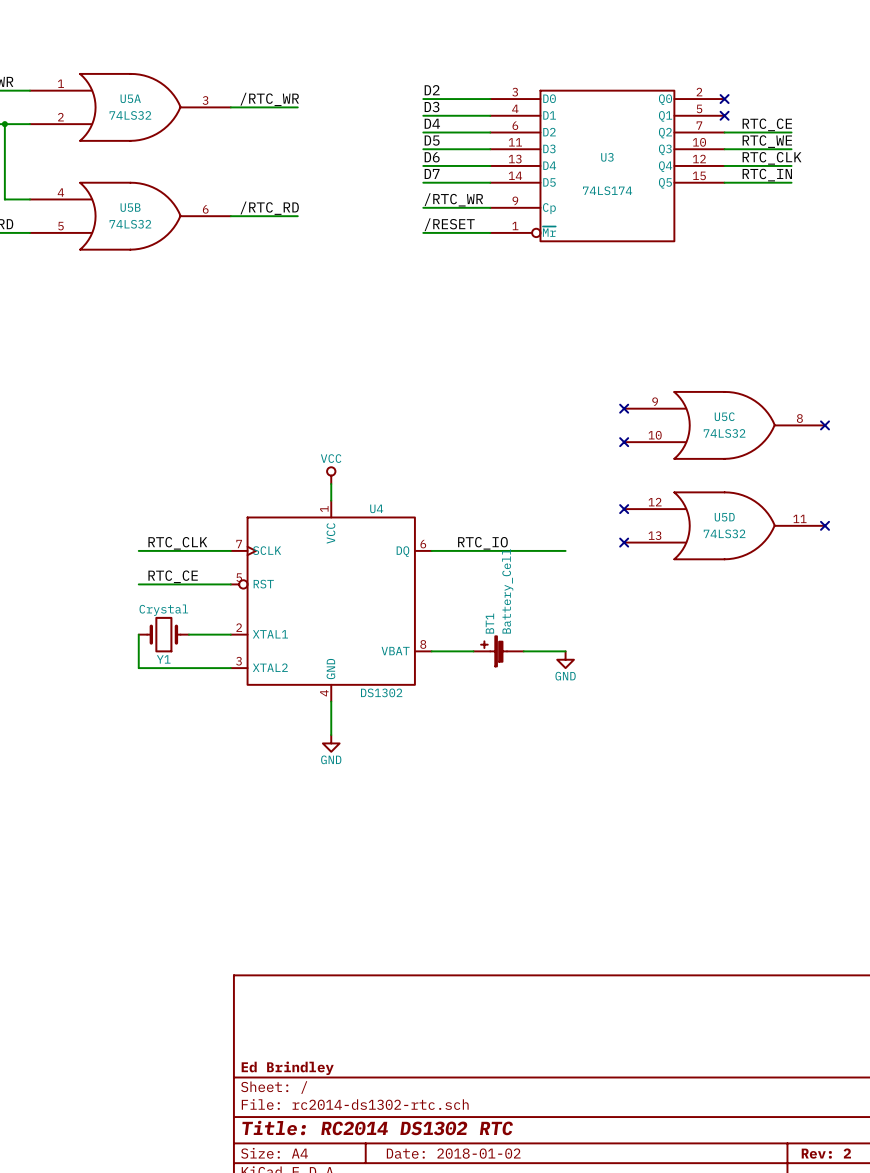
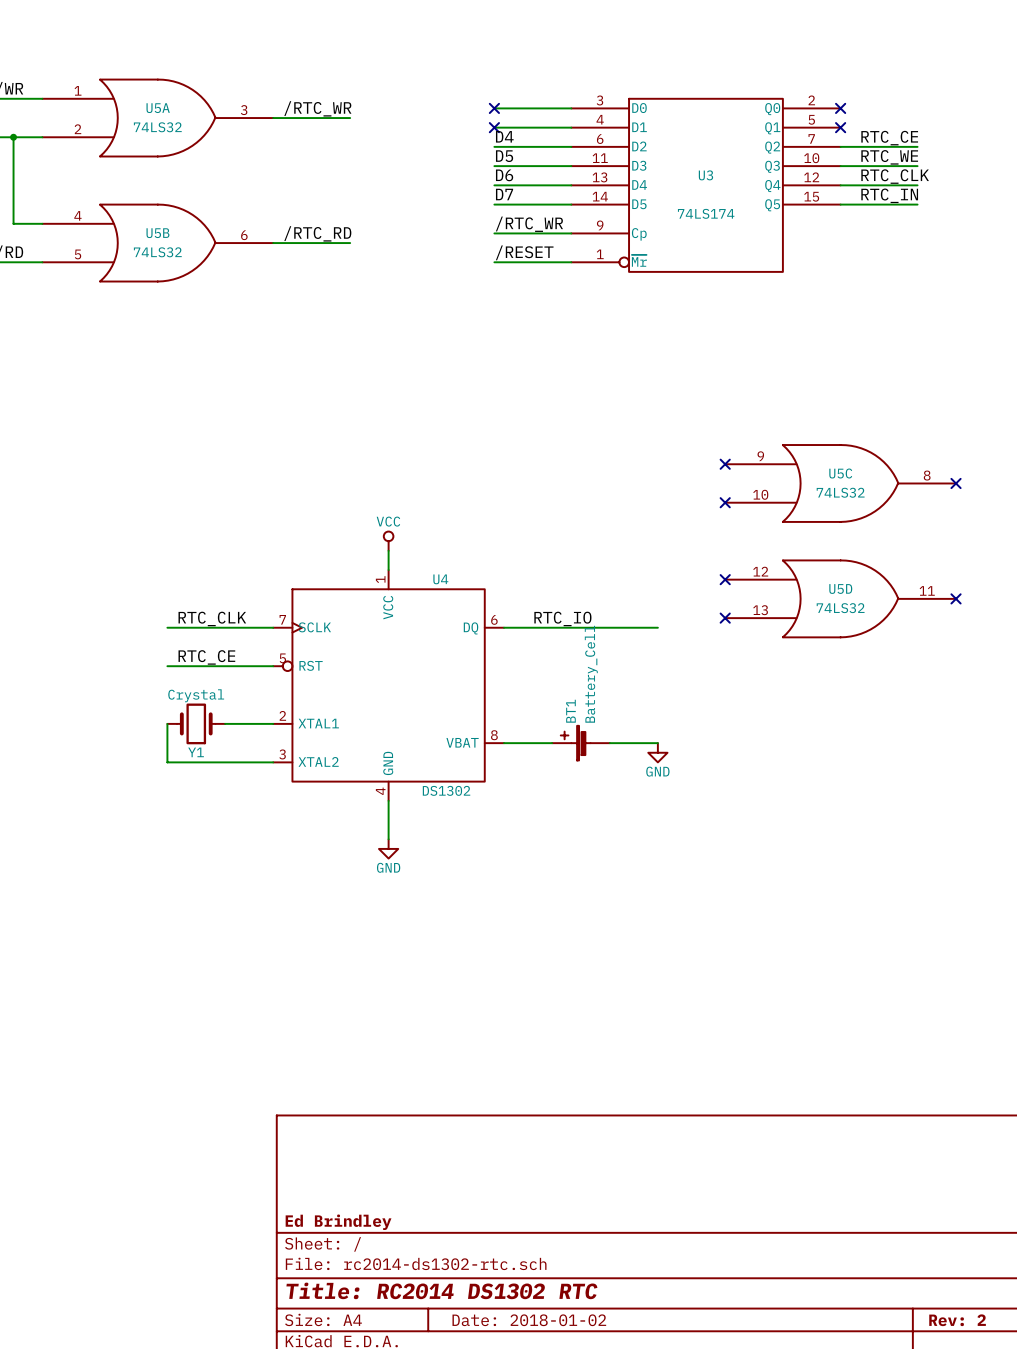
label: D2 (432, 90) -> none
no-connect mark: none -> (494, 108)
label: D3 (432, 107) -> none
no-connect mark: none -> (494, 127)

